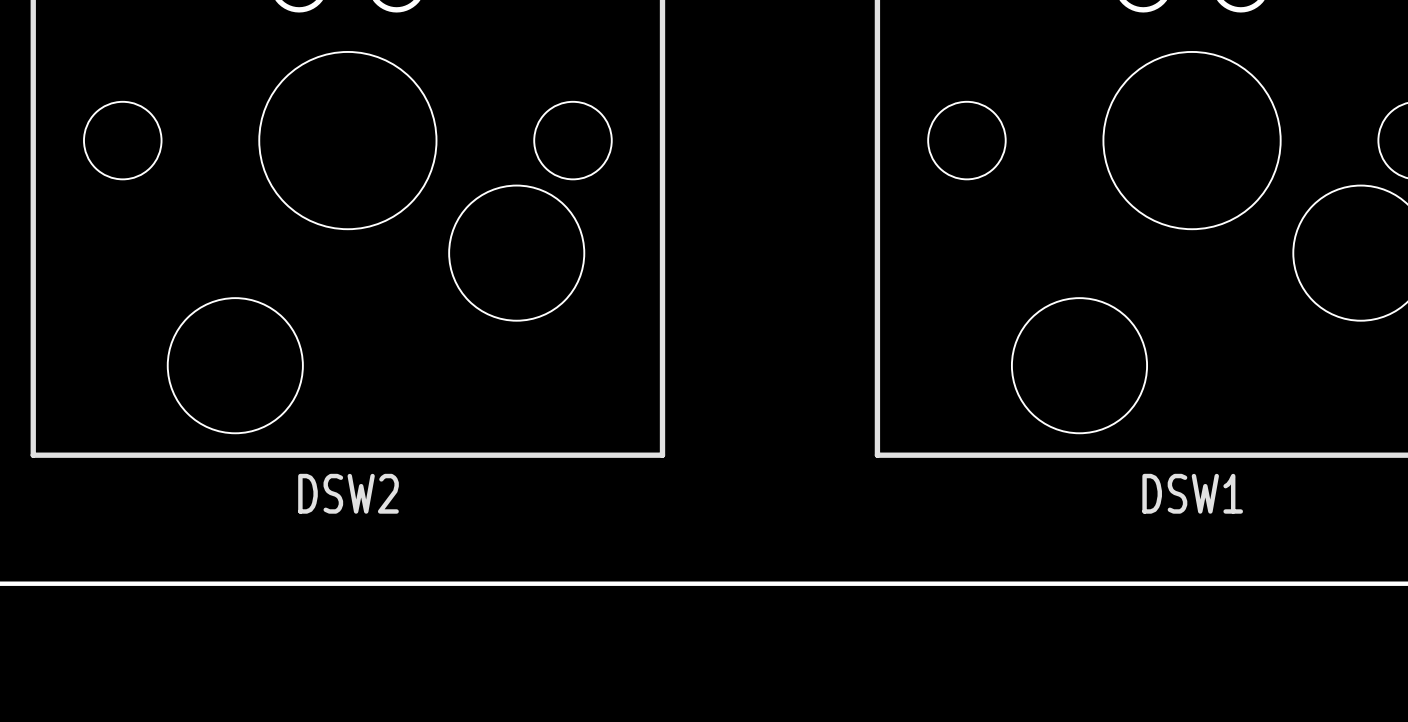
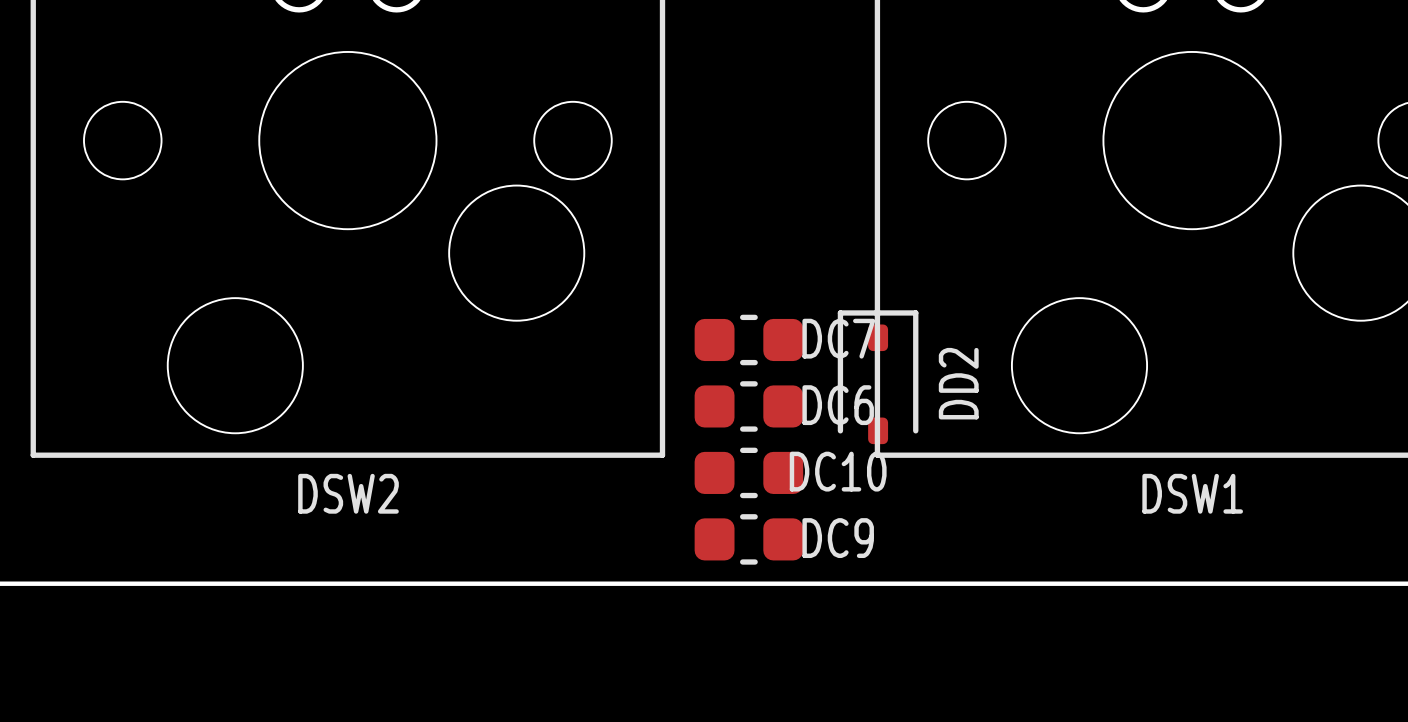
DC7: none -> (748, 339)
DD2: none -> (878, 377)
DC6: none -> (748, 406)
DC10: none -> (748, 472)
DC9: none -> (748, 539)

